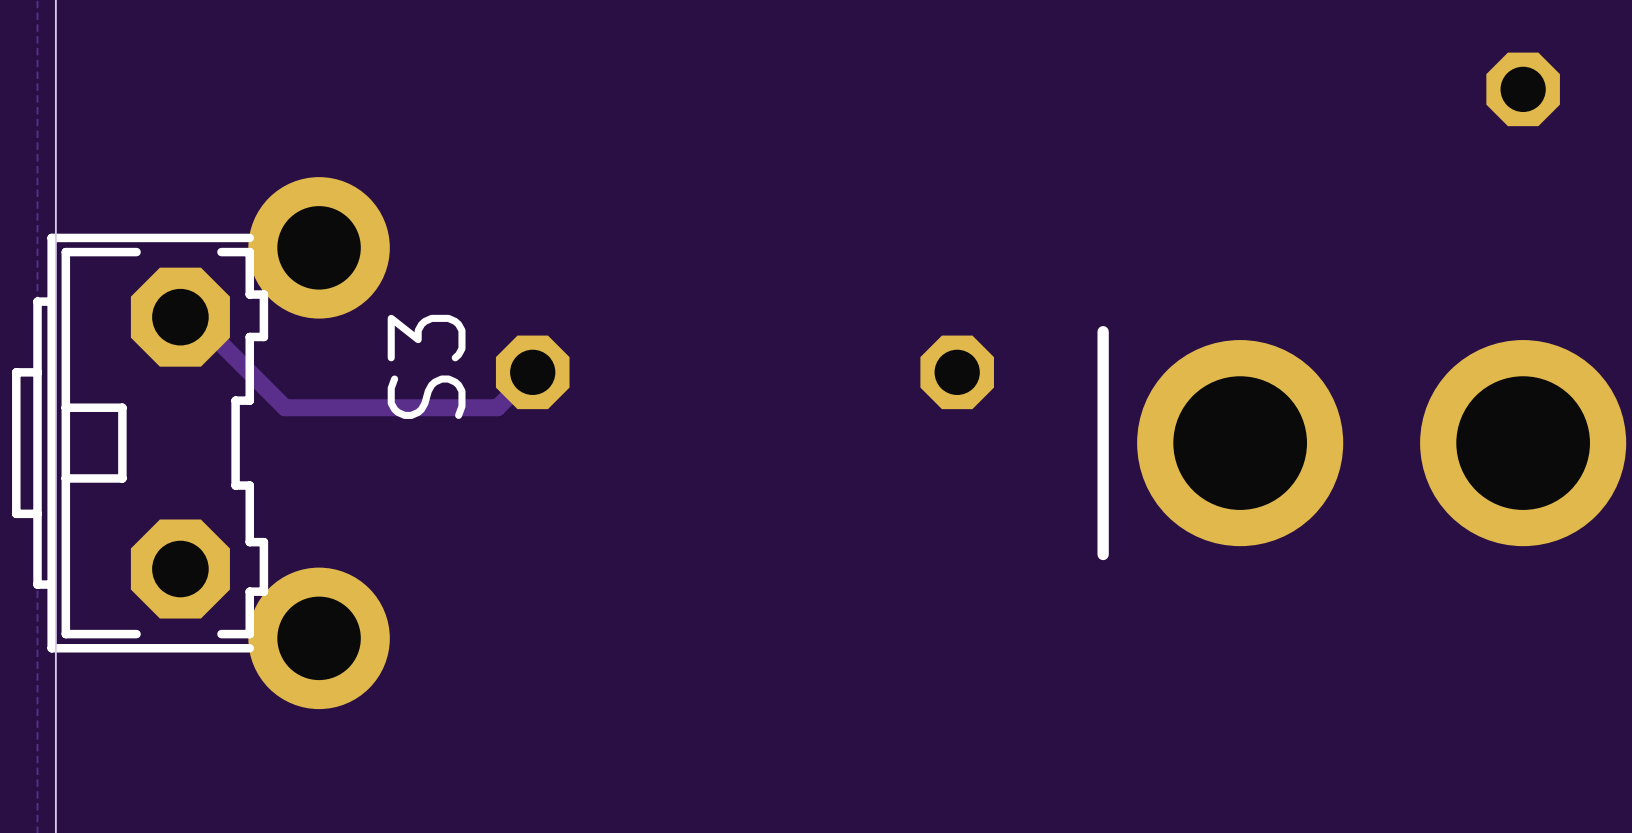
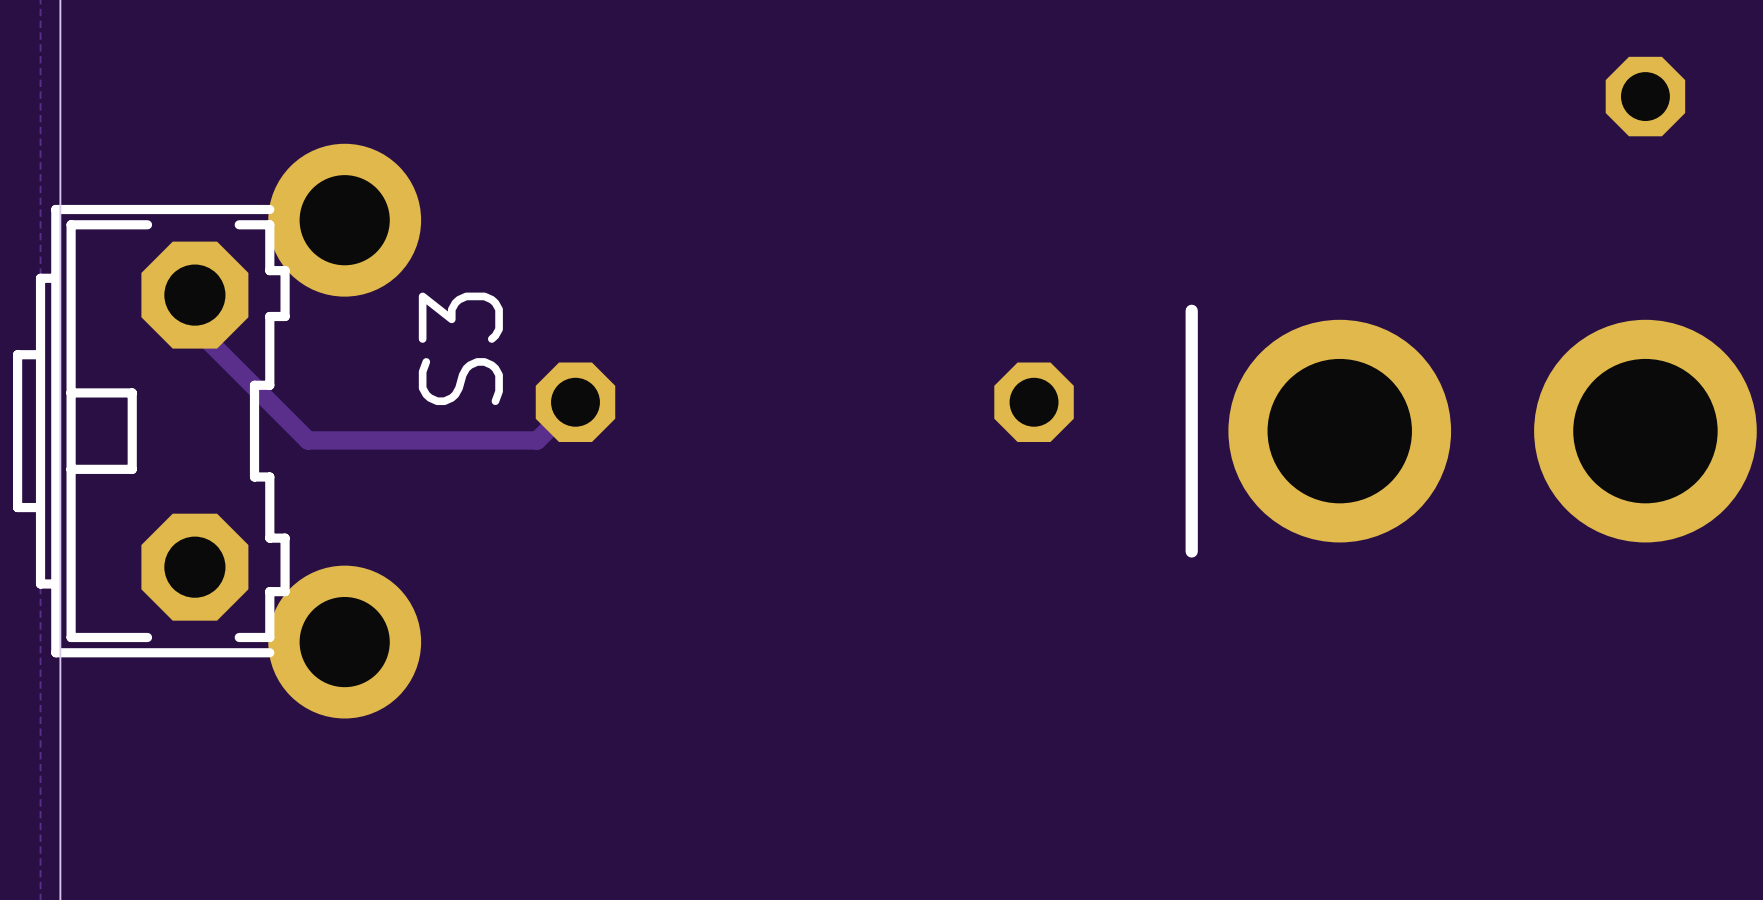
S3 position: (200, 443) -> (217, 431)
part position: (1361, 443) -> (1471, 431)

